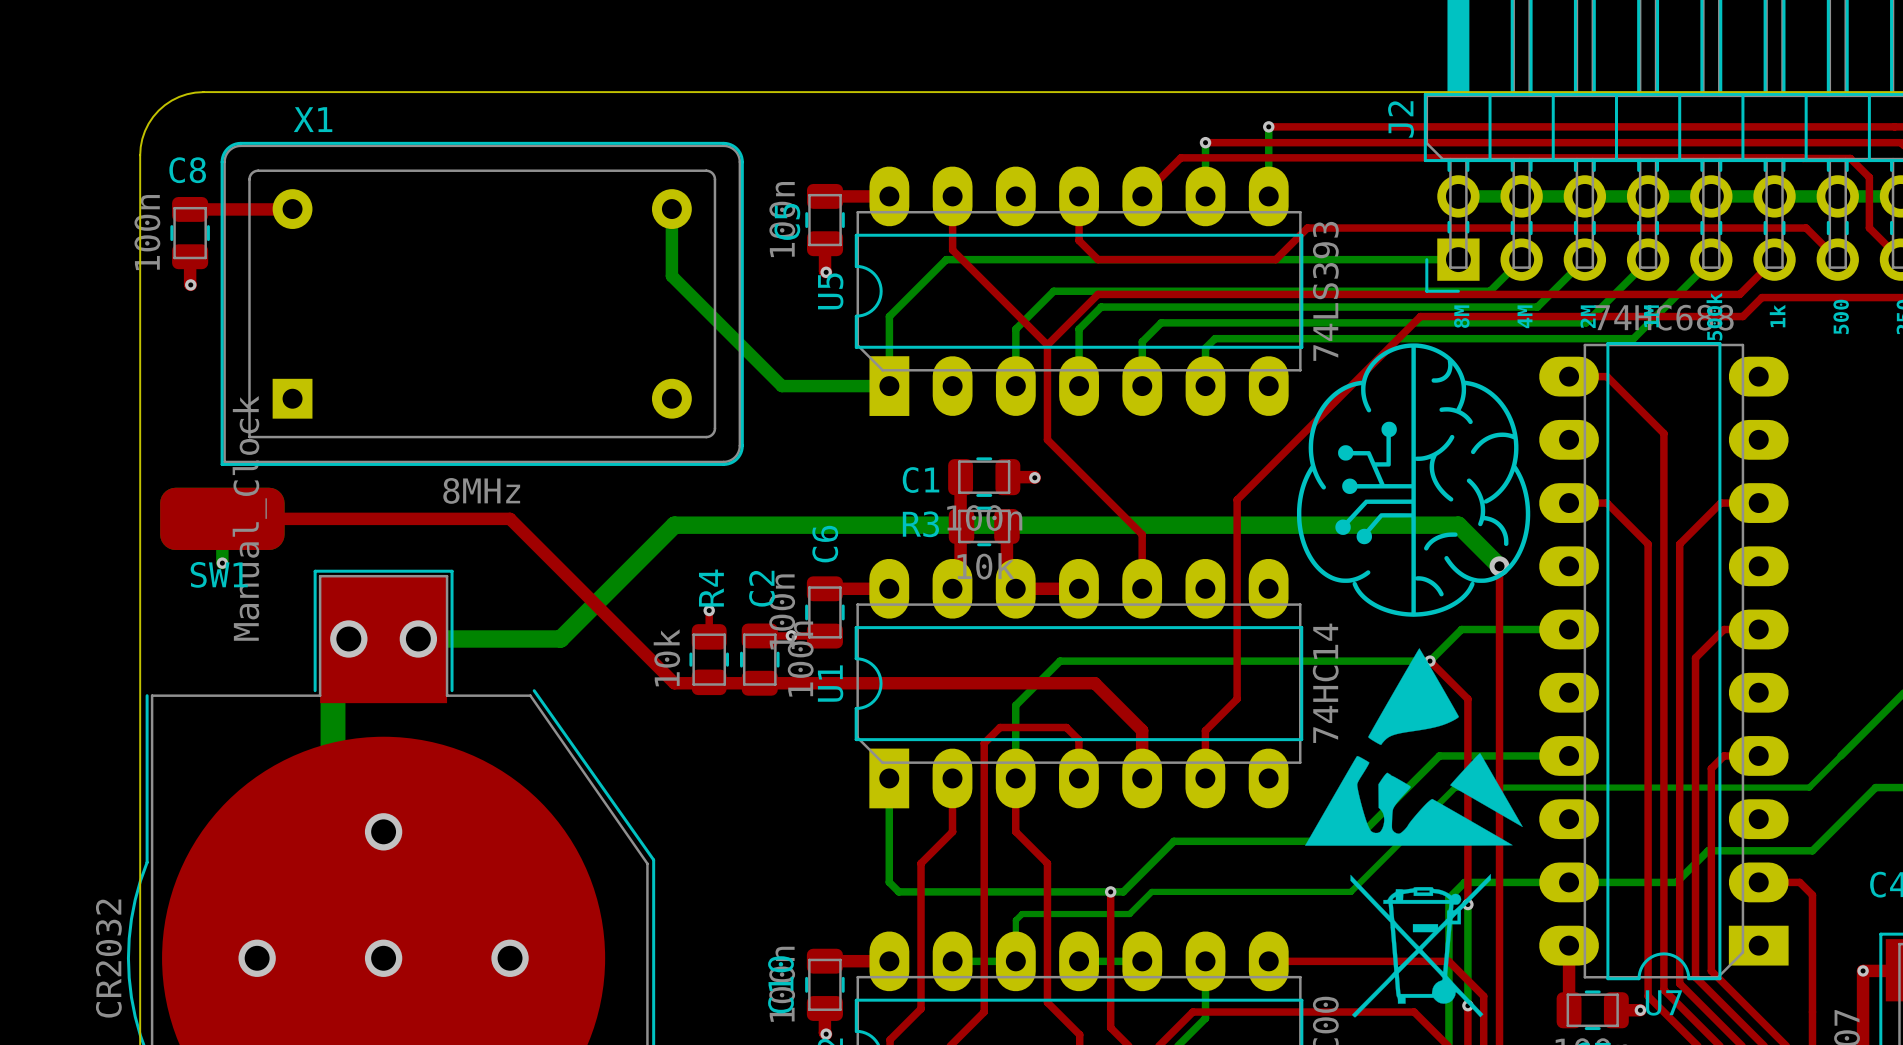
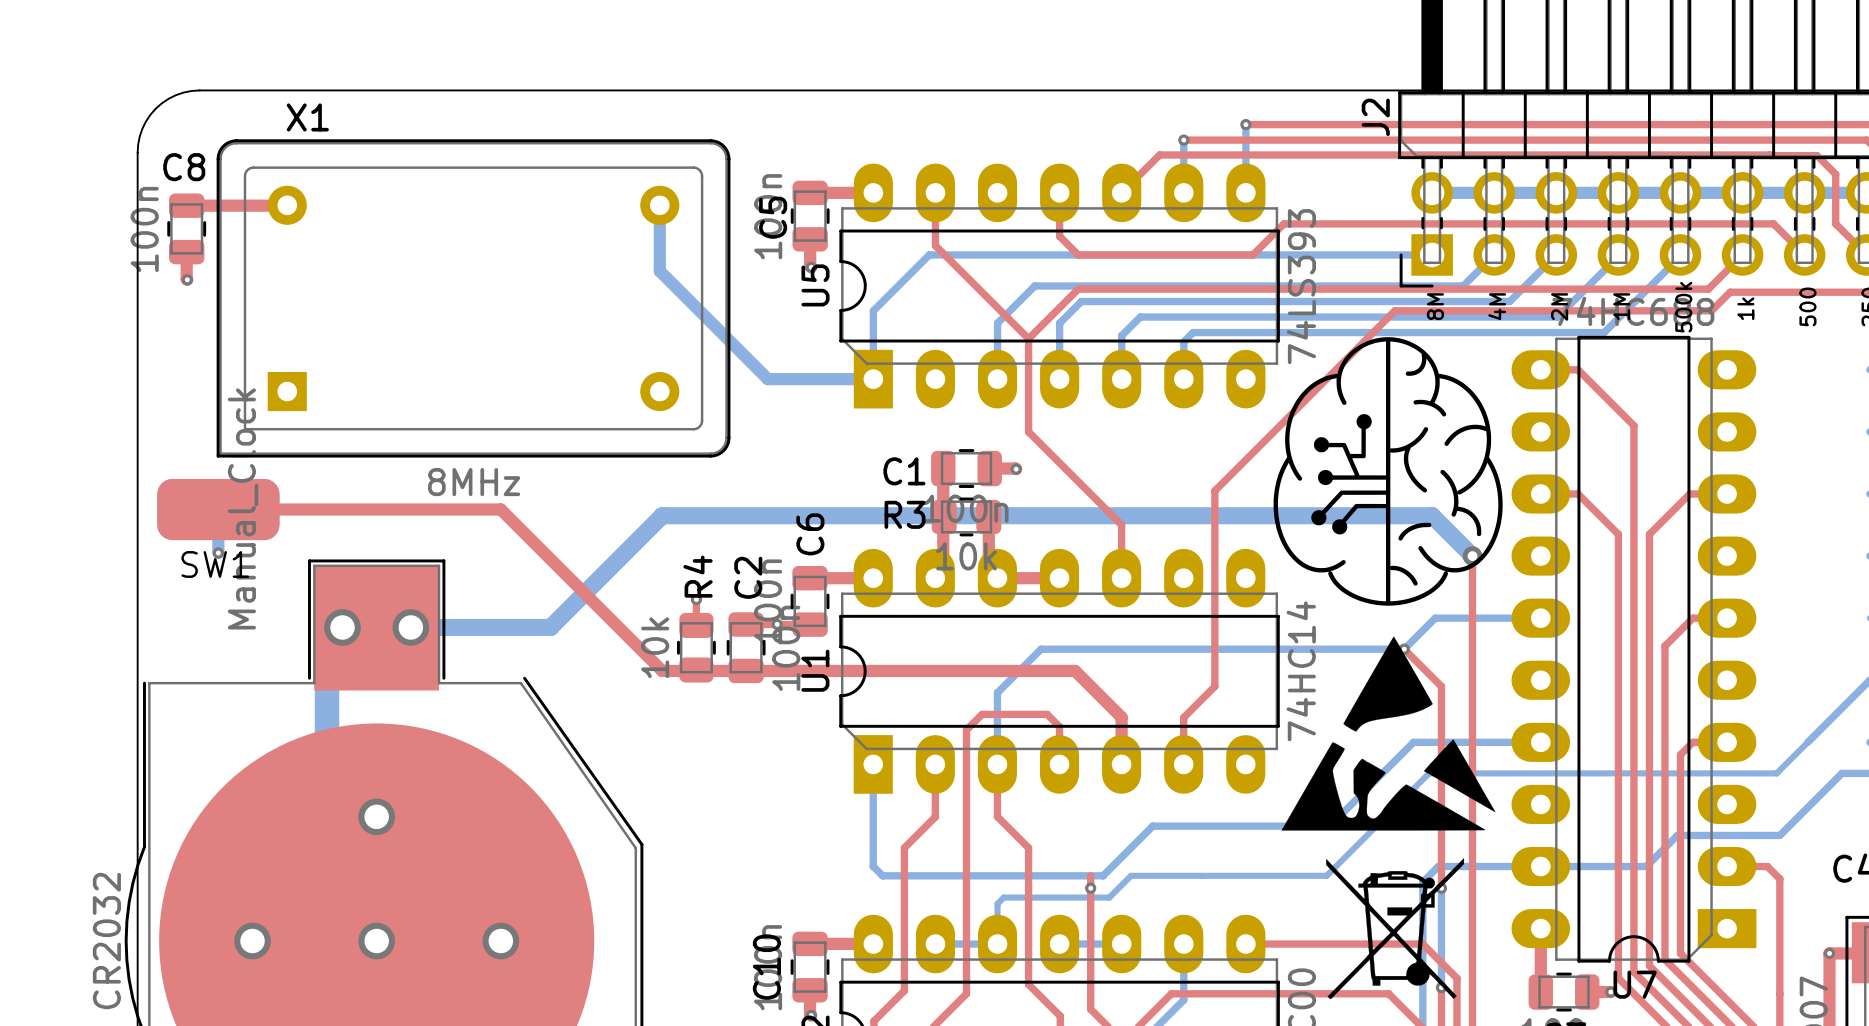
via position: (1110, 891) -> (1090, 888)

